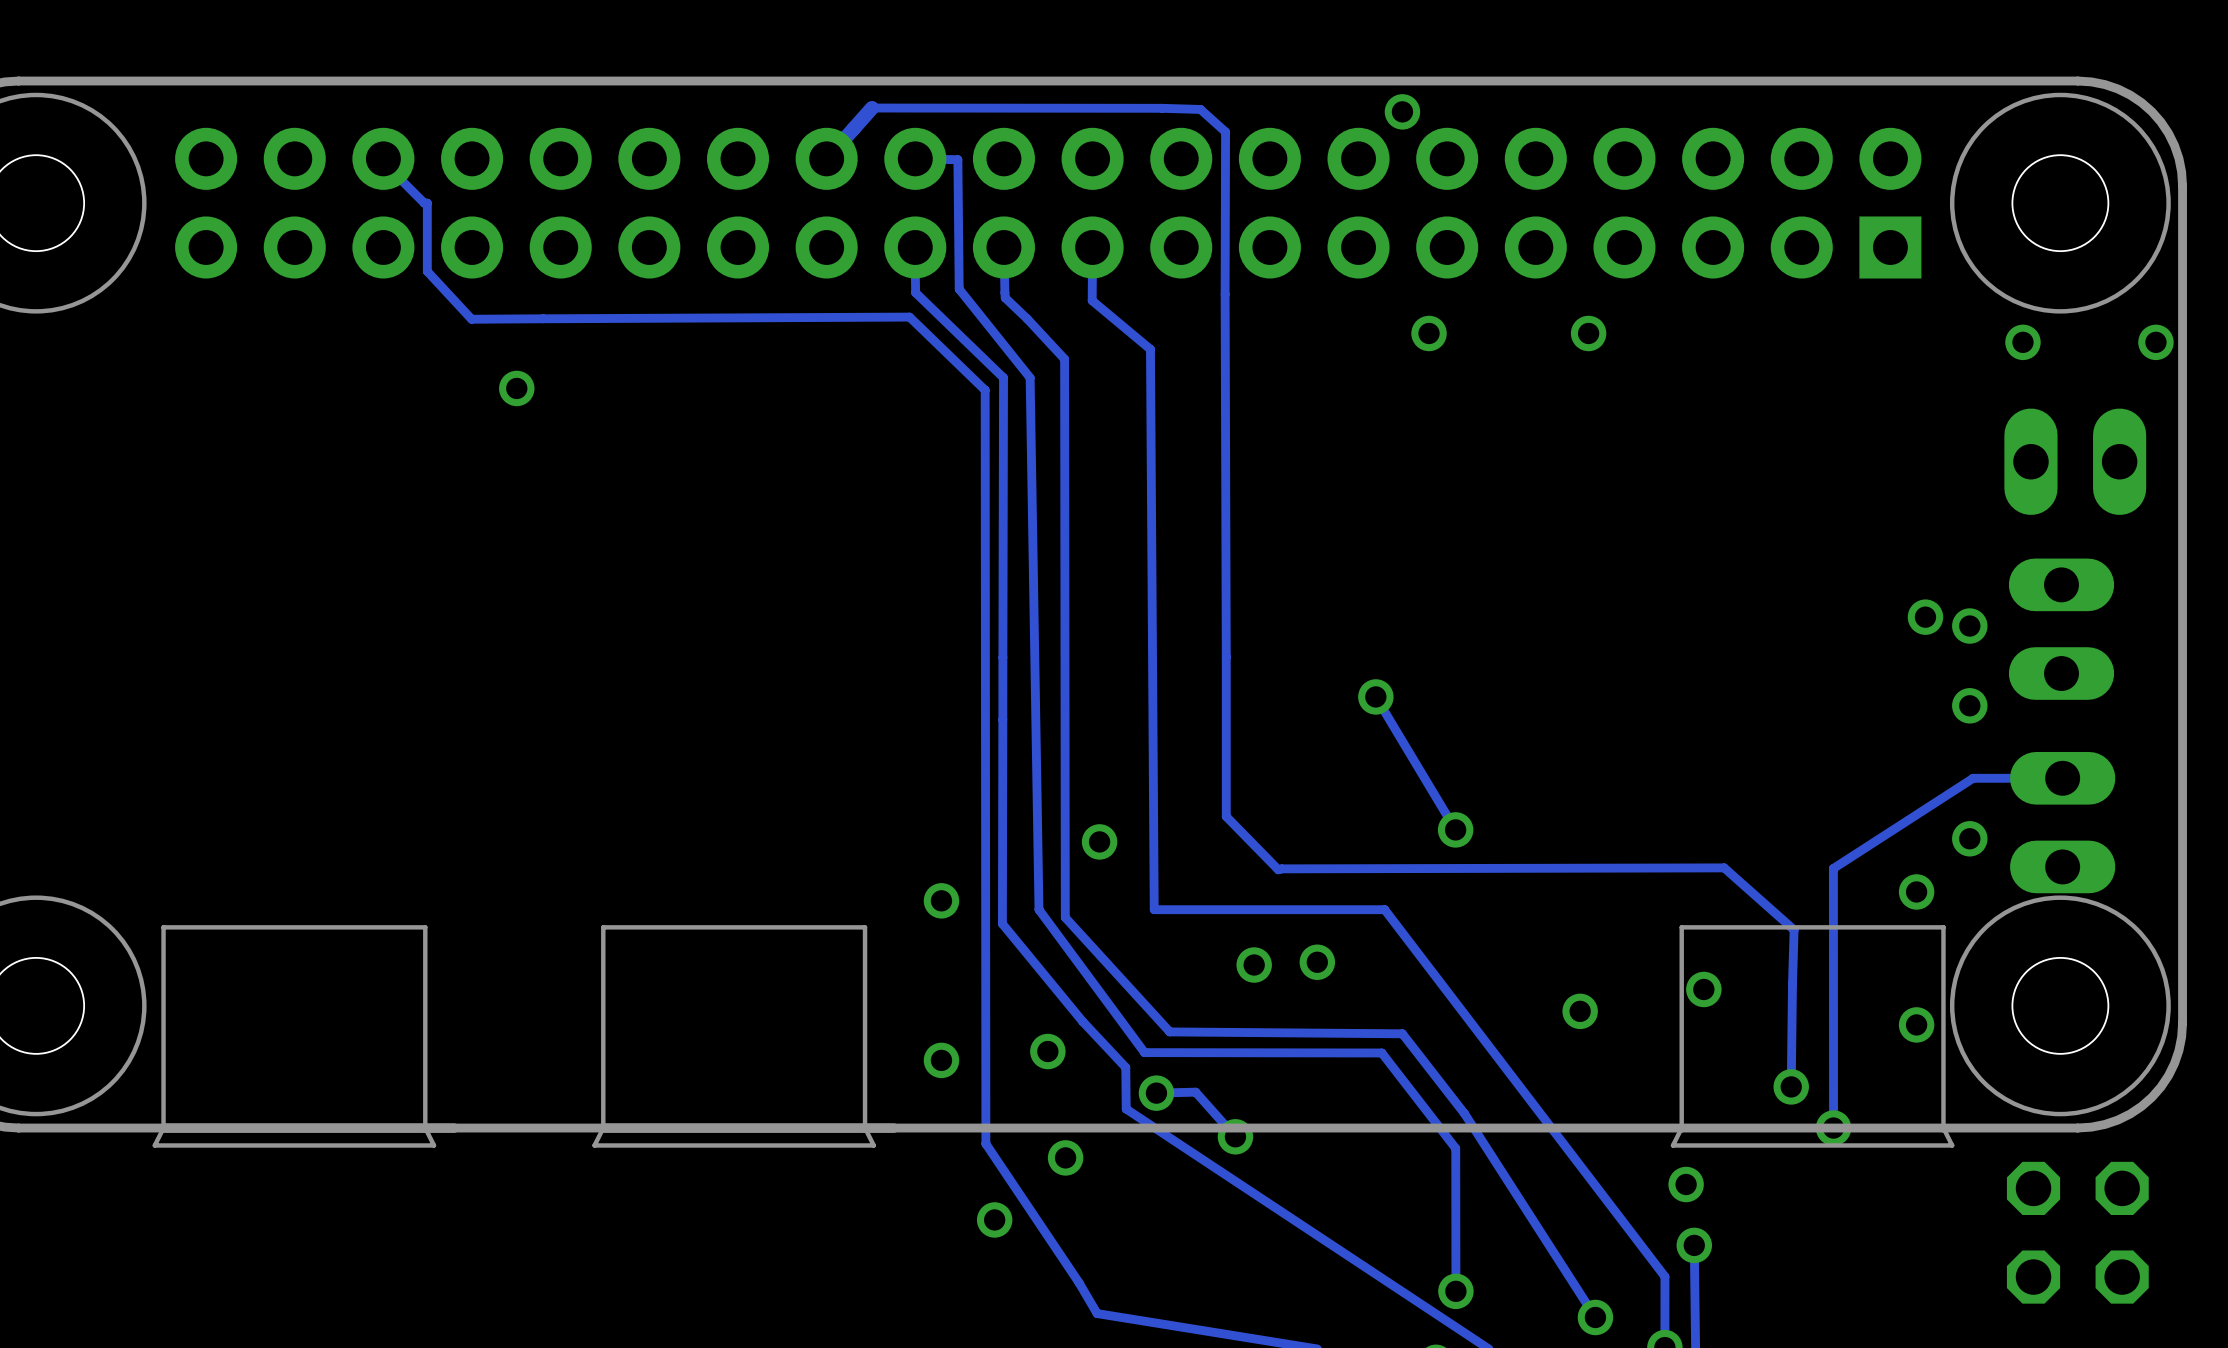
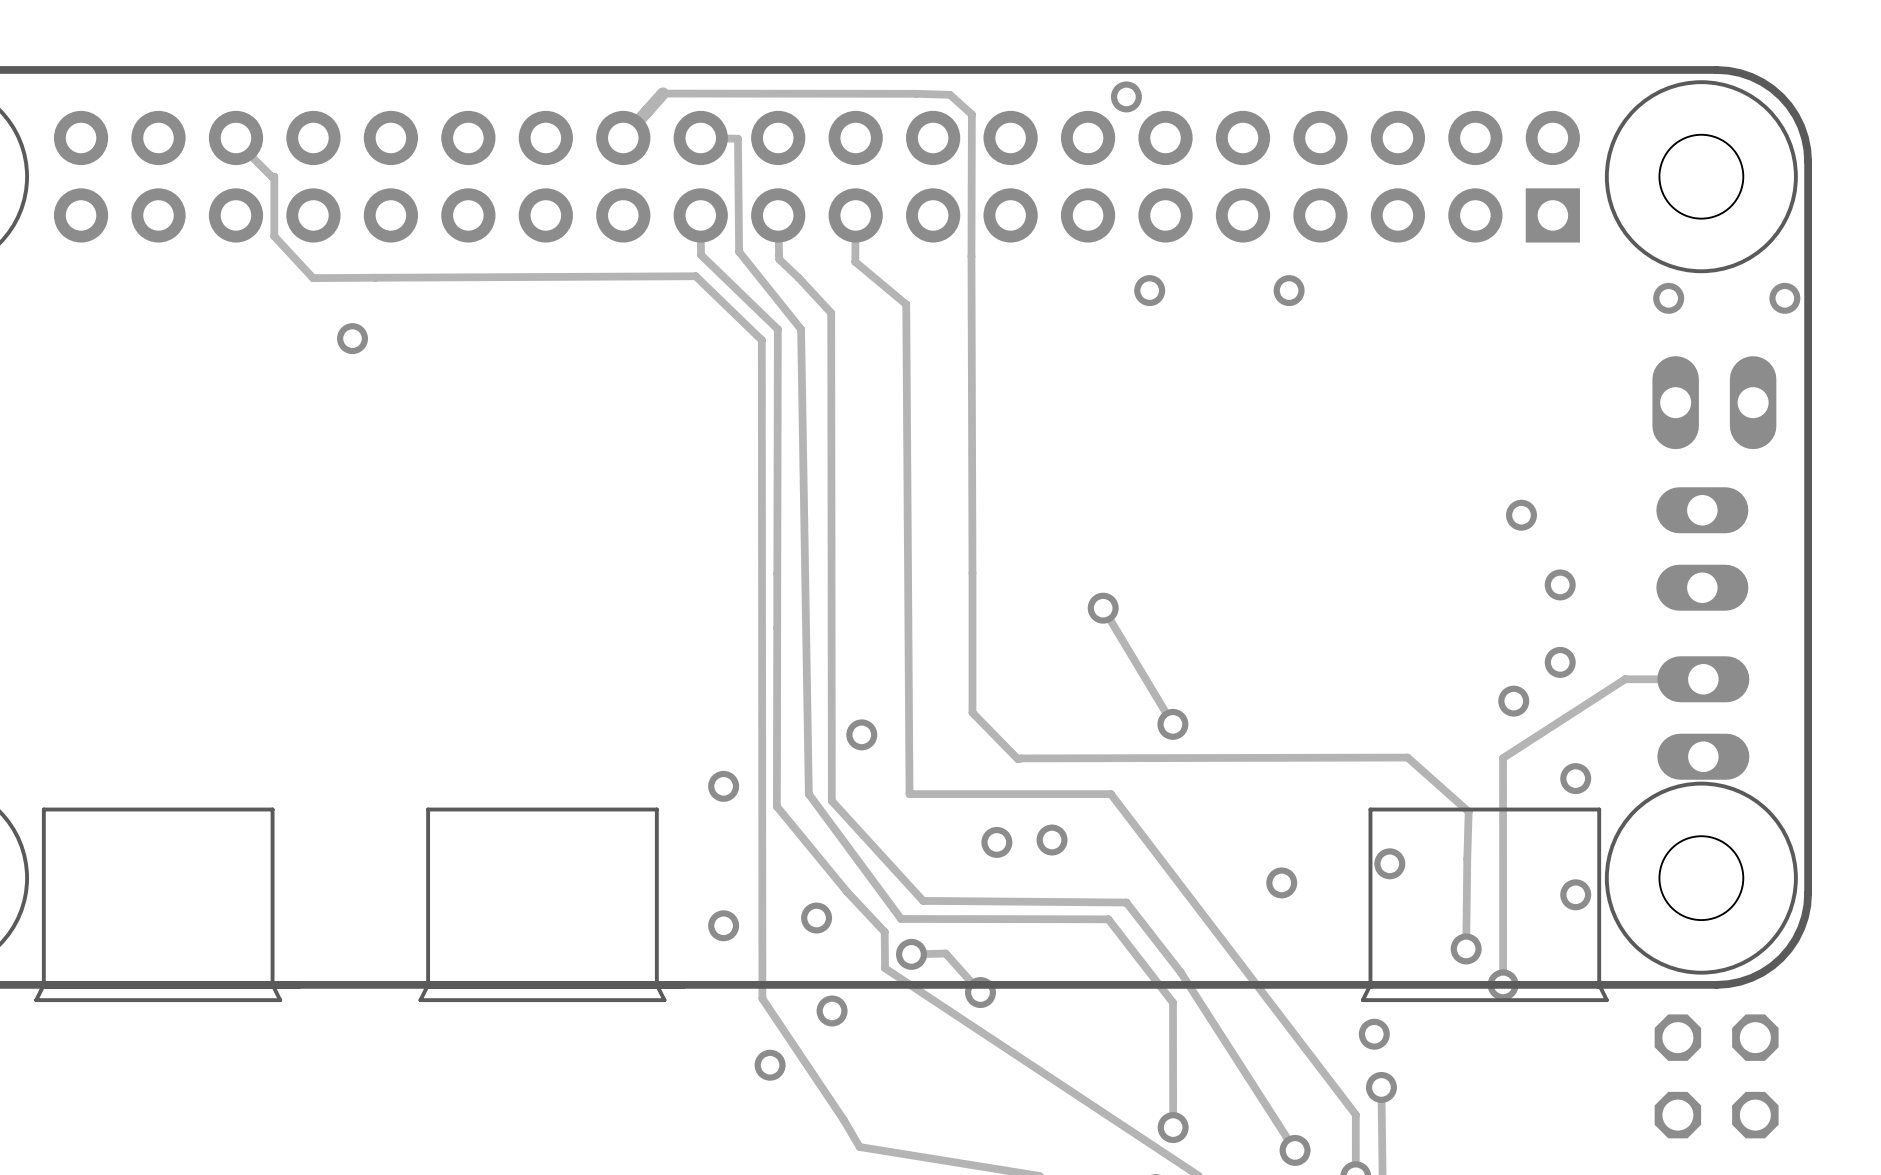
via: none -> (1521, 515)
via: (1925, 617) -> none
via: (1969, 626) -> none
via: none -> (1560, 584)
via: (1969, 705) -> none
via: none -> (1560, 662)
via: none -> (1513, 701)
via: (1969, 838) -> none

